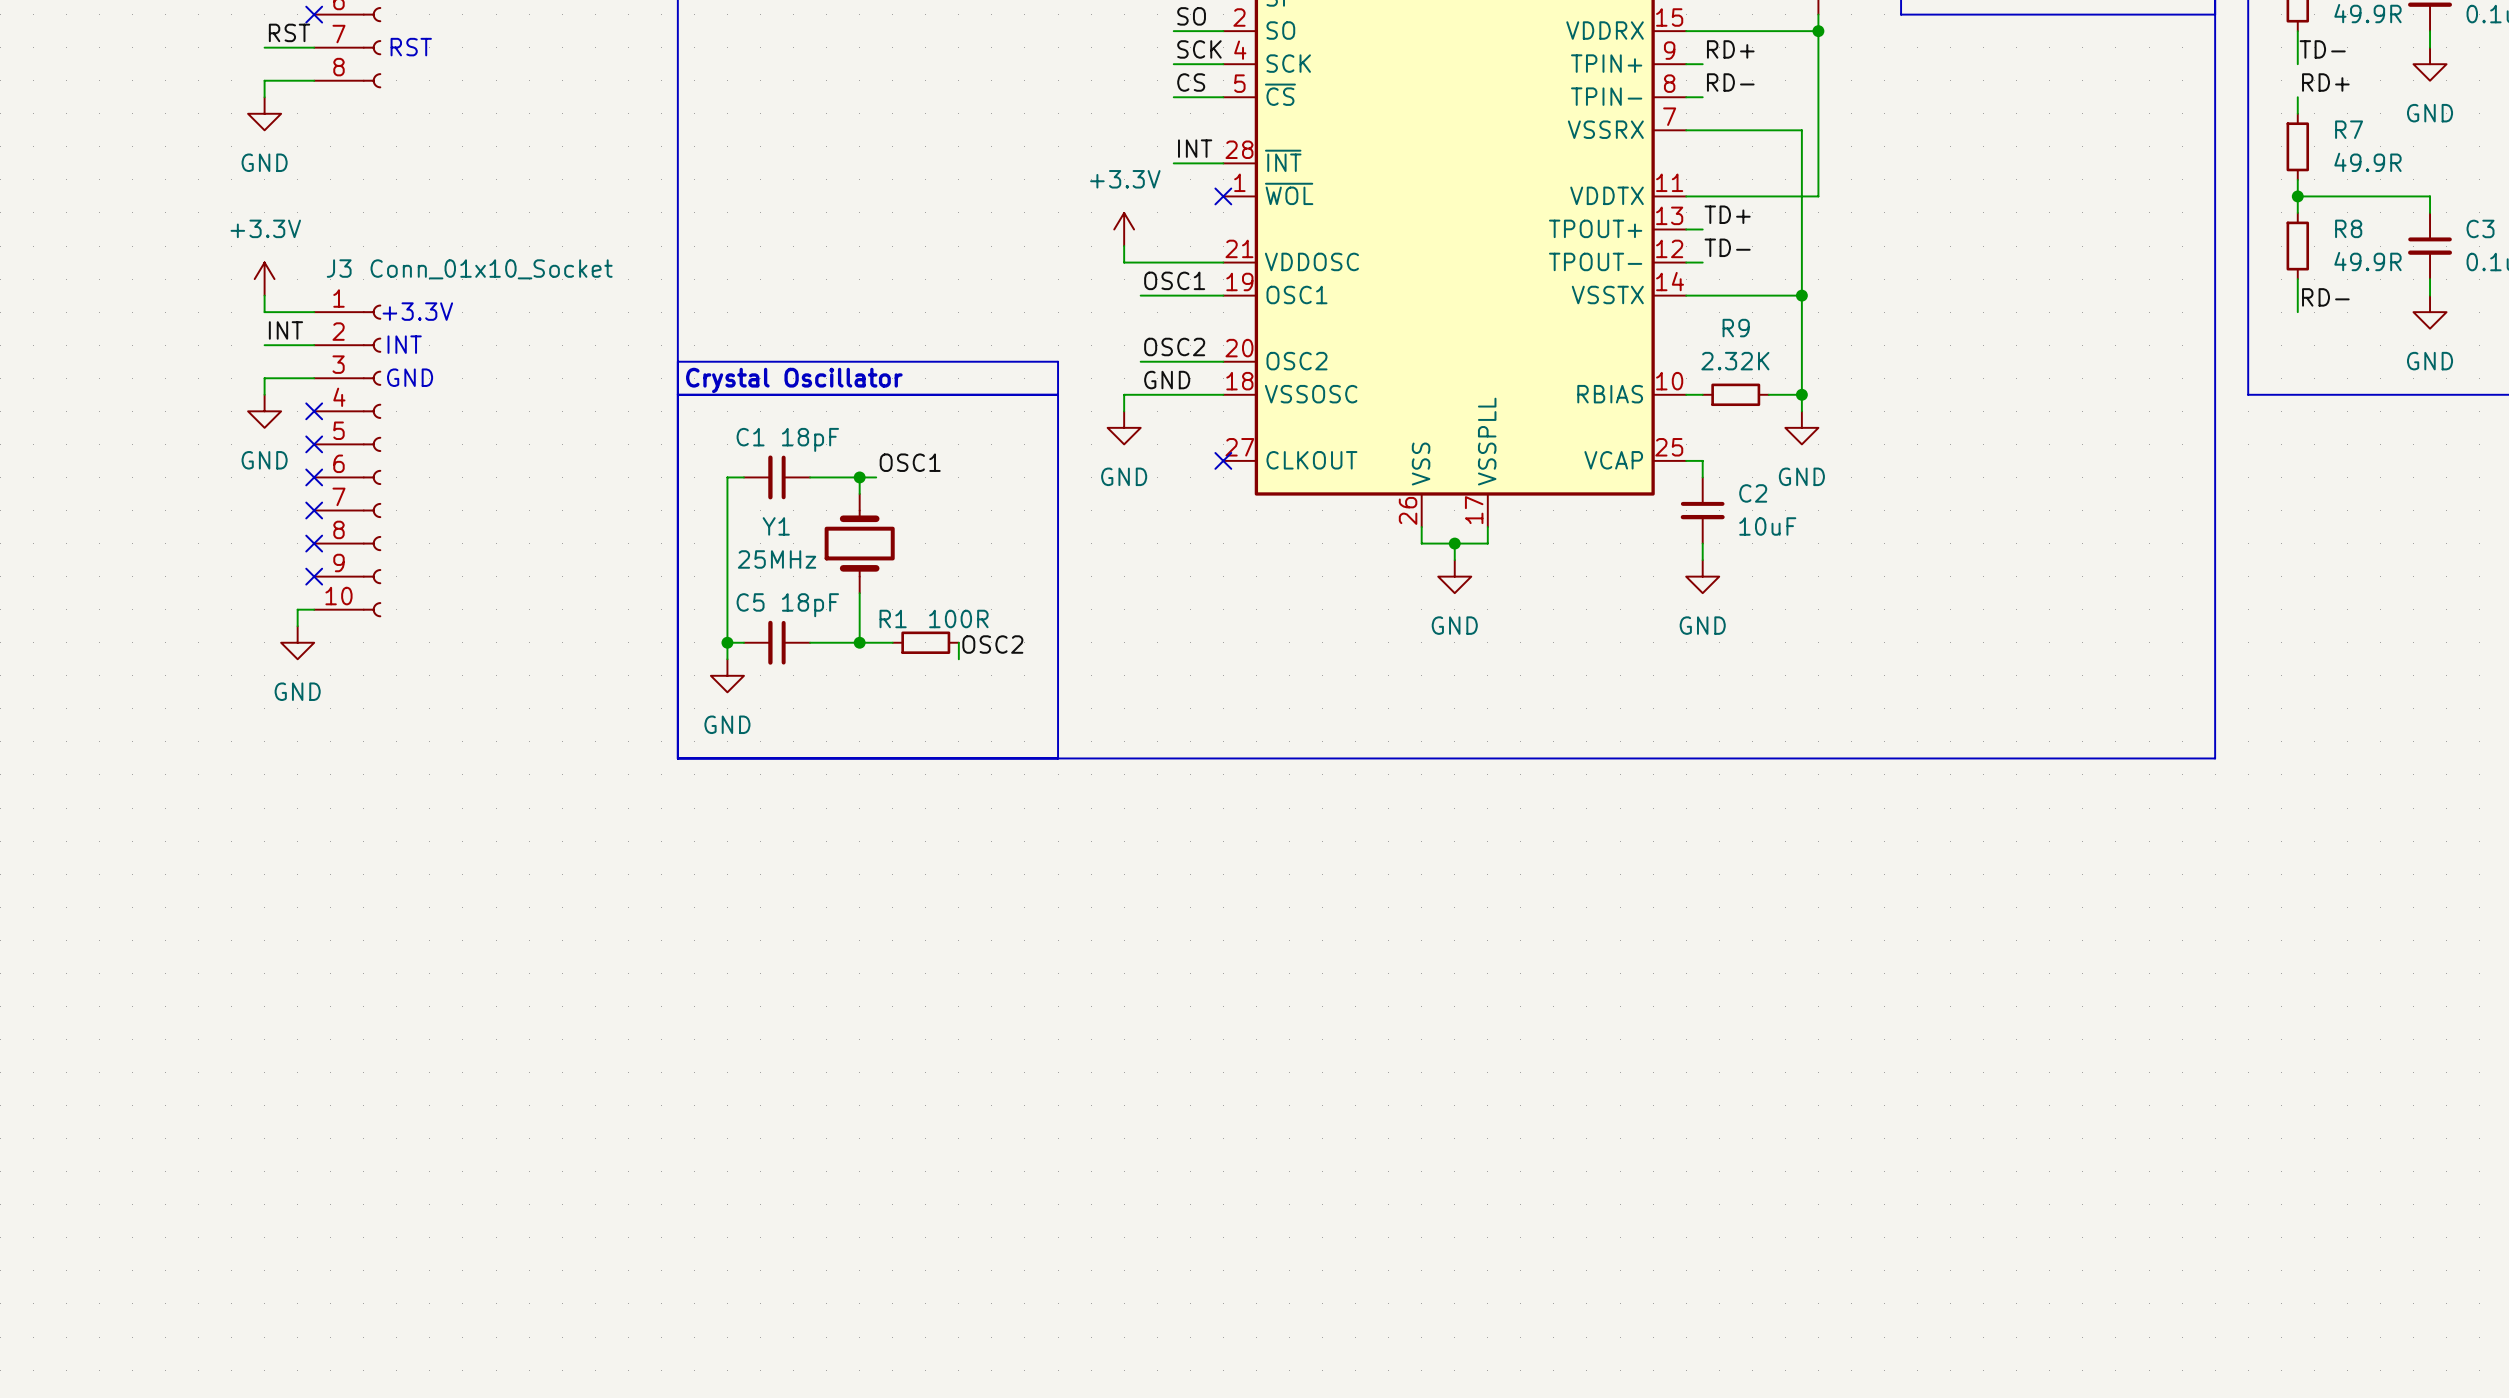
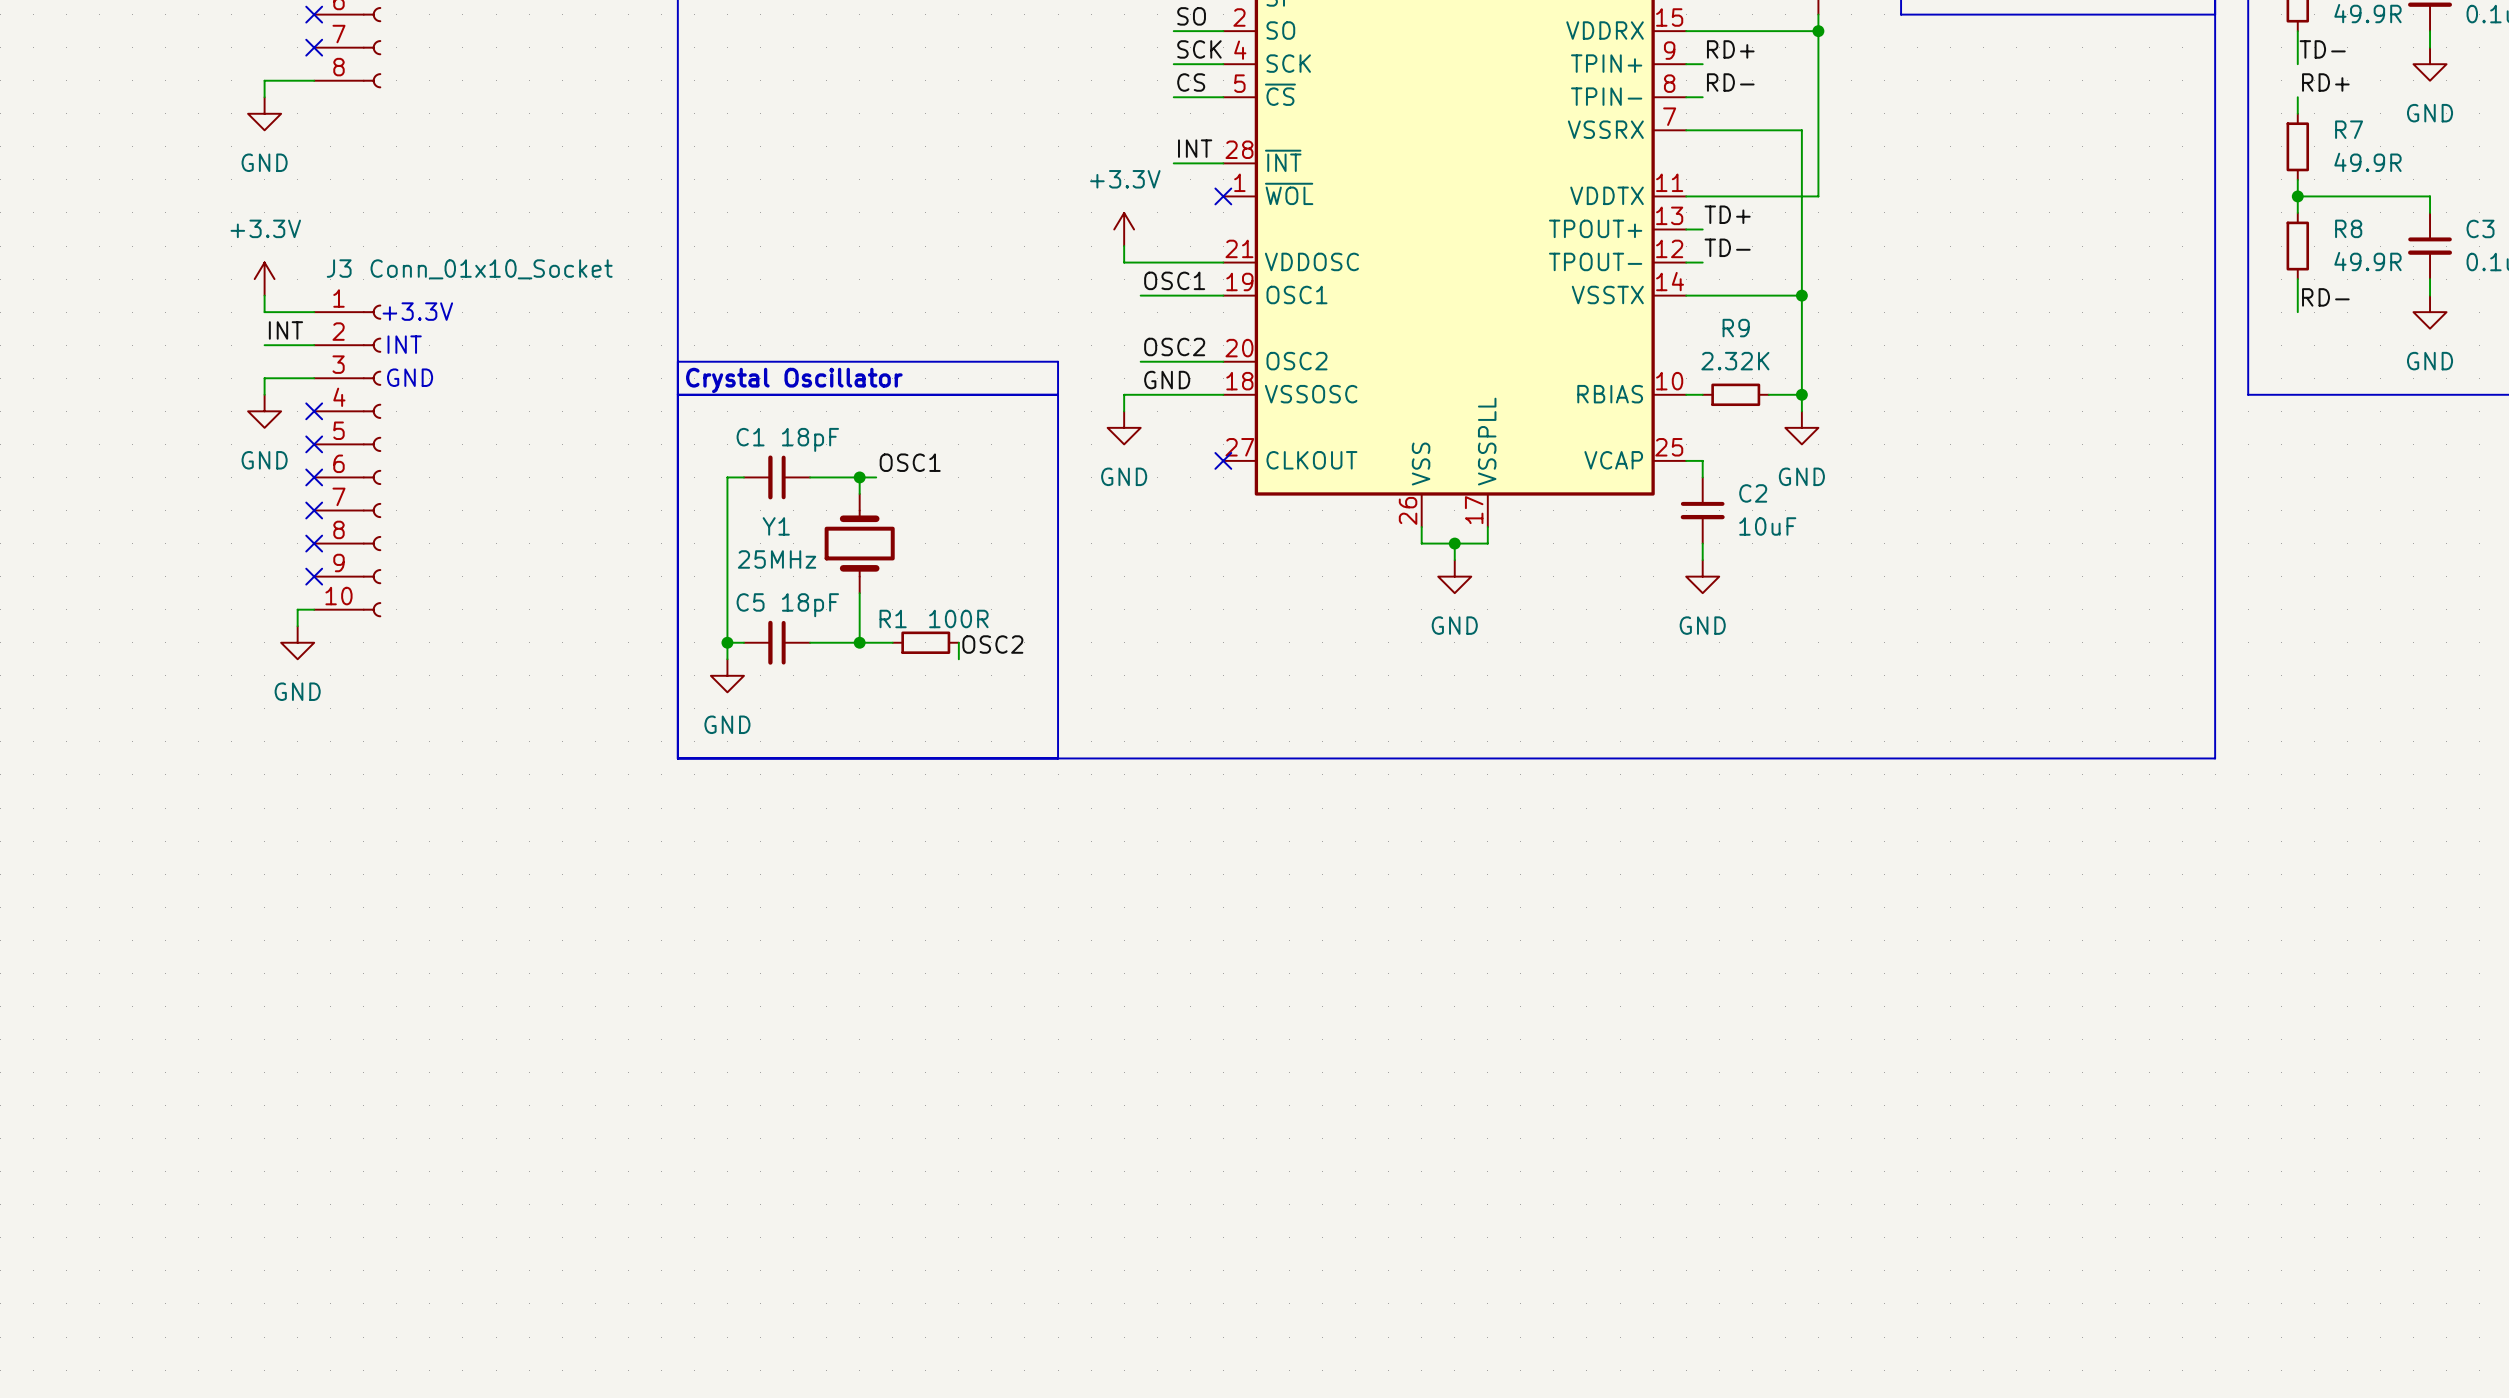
label: RST (289, 32) -> none
wire: (264, 47) (314, 47) -> none
no-connect mark: none -> (314, 47)
text: RST (411, 47) -> none

